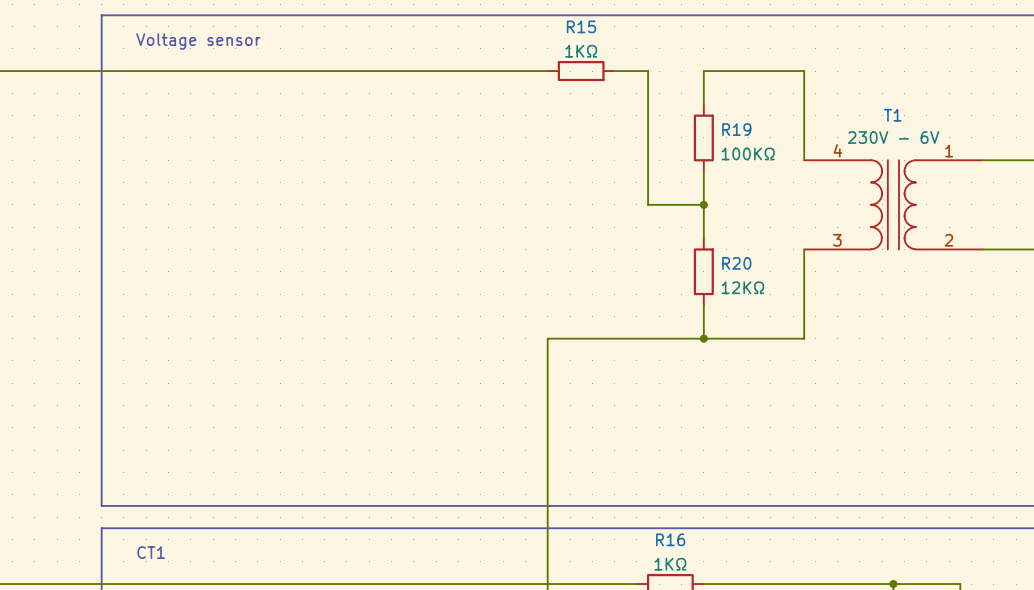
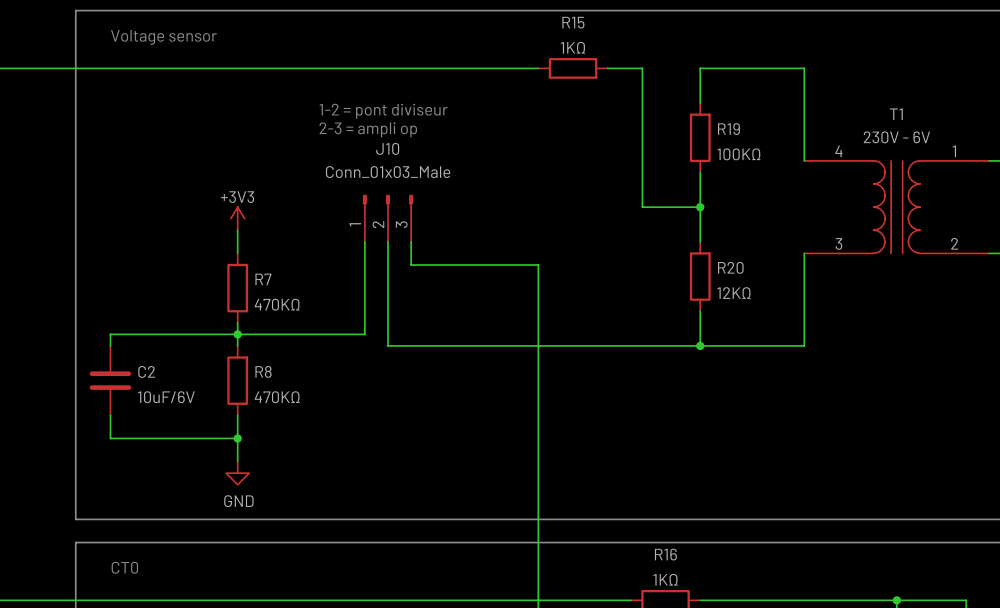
text: none -> 1-2 = pont diviseur (383, 111)
text: none -> 2-3 = ampli op (368, 129)
J10: none -> Conn_01x03_Male (388, 218)
power symbol: none -> +3V3 (237, 218)
wire: none -> (237, 230) (237, 253)
wire: none -> (364, 241) (364, 334) (110, 334) (110, 345)
wire: none -> (388, 241) (388, 345) (538, 345) (538, 264) (411, 264) (411, 241)
R7: none -> 470KΩ (237, 288)
wire: none -> (237, 322) (237, 345)
junction: none -> (237, 334)
C2: none -> 10uF/6V (110, 380)
R8: none -> 470KΩ (237, 380)
wire: none -> (110, 415) (110, 438) (237, 438)
wire: none -> (237, 415) (237, 461)
junction: none -> (237, 438)
power symbol: none -> GND (237, 473)
text: CT1 (151, 552) -> CT0 (124, 567)

